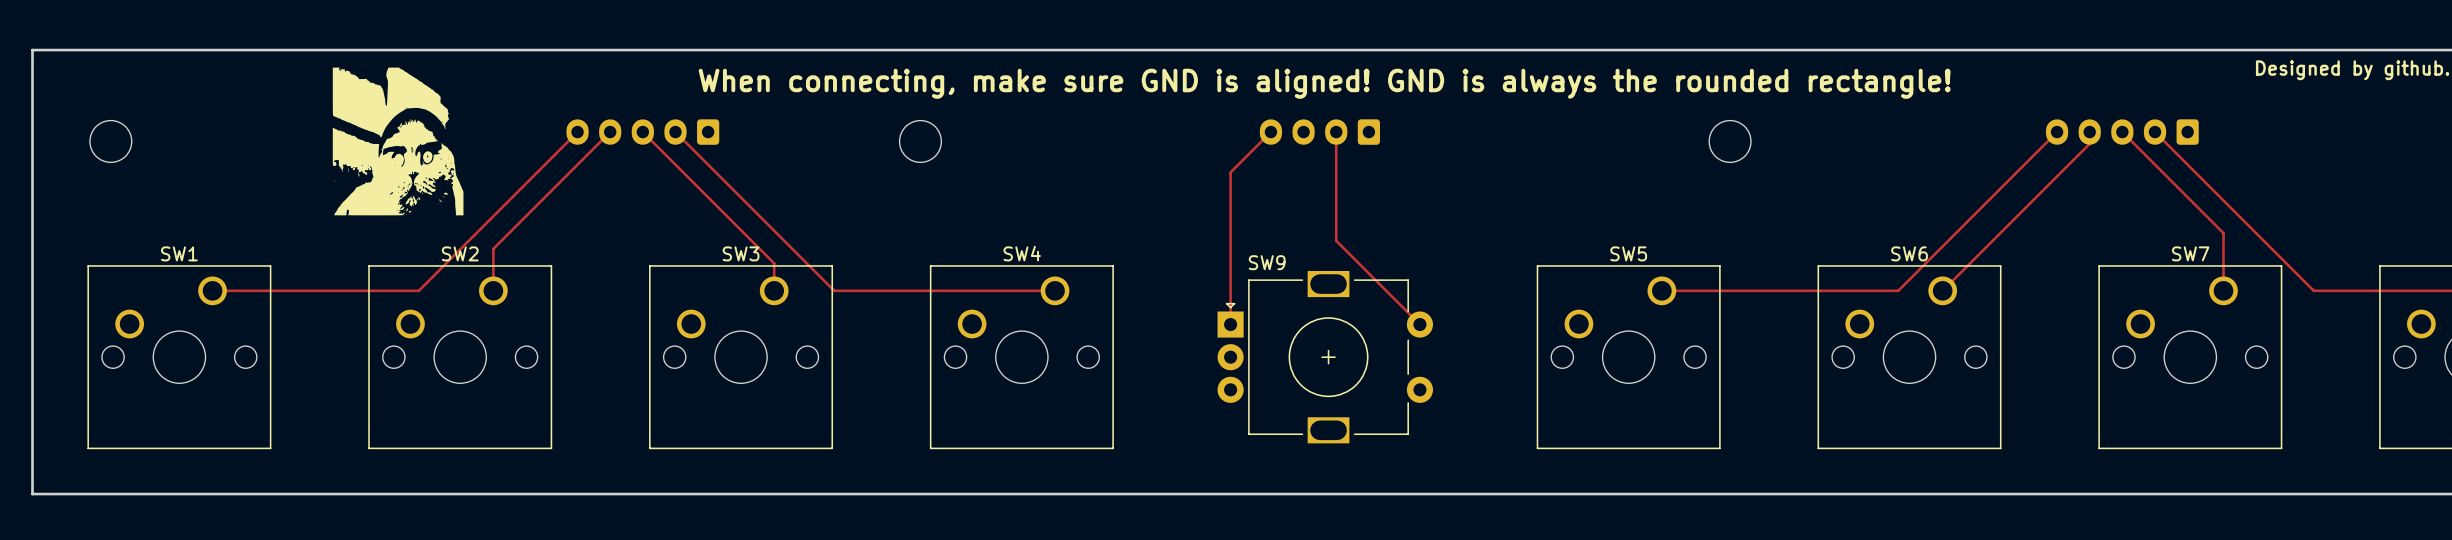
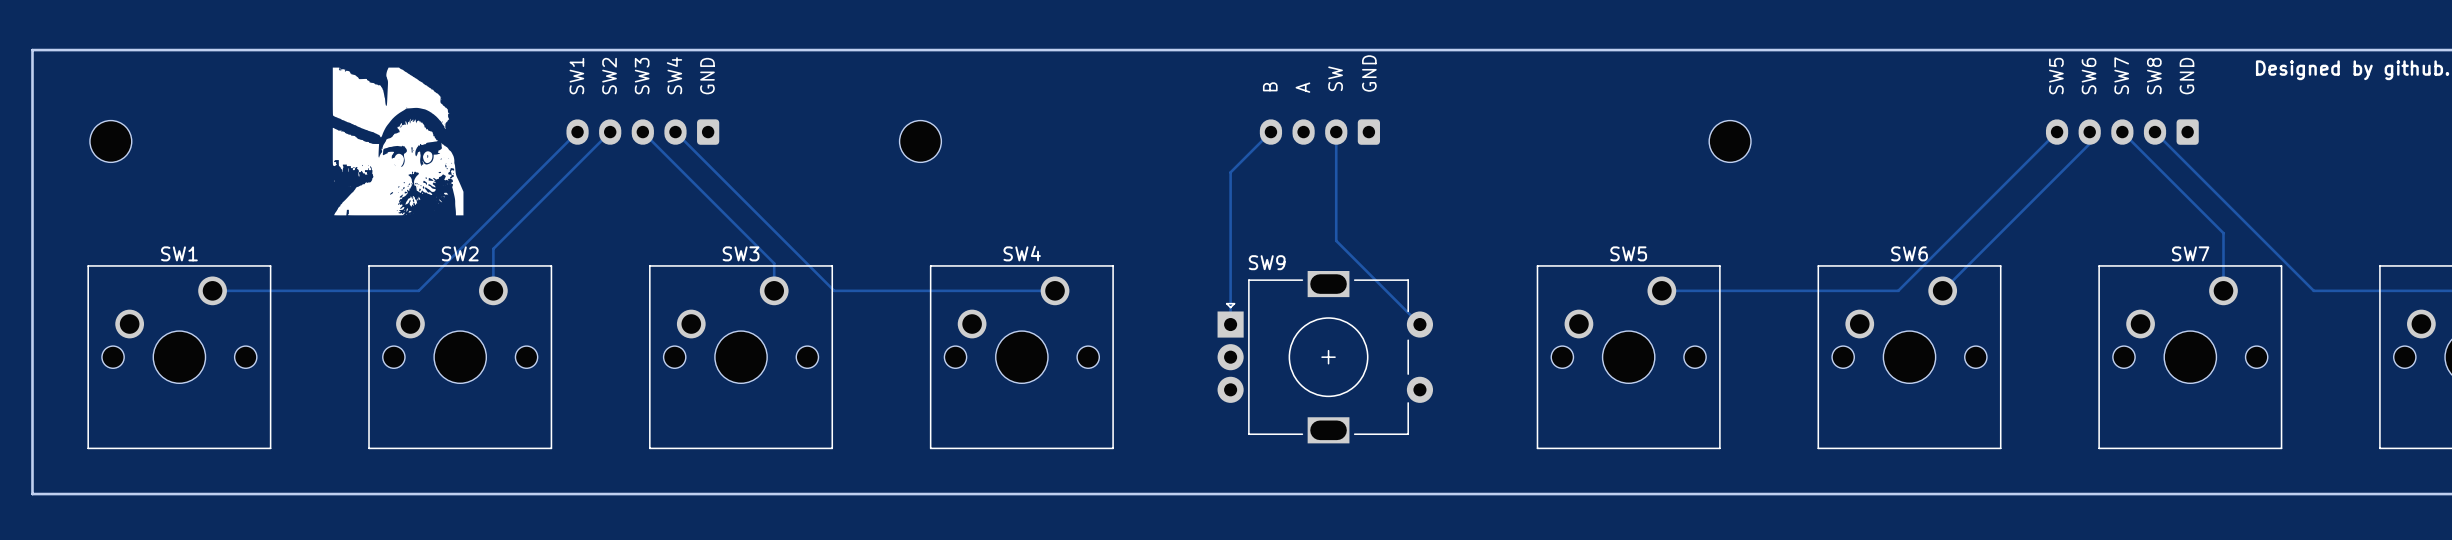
text: none -> GND (1369, 73)
text: none -> SW4 (674, 75)
text: none -> SW7 (2121, 75)
text: none -> SW1 (576, 76)
text: none -> SW2 (609, 76)
text: none -> SW3 (642, 76)
text: none -> GND (707, 76)
text: none -> SW5 (2056, 76)
text: none -> SW6 (2089, 76)
text: none -> SW8 (2154, 76)
text: none -> GND (2186, 76)
text: none -> SW (1335, 78)
text: When connecting, make sure GND is aligned! GND is always the rounded rectangle! (1324, 83) -> none
text: none -> B (1270, 86)
text: none -> A (1302, 87)

